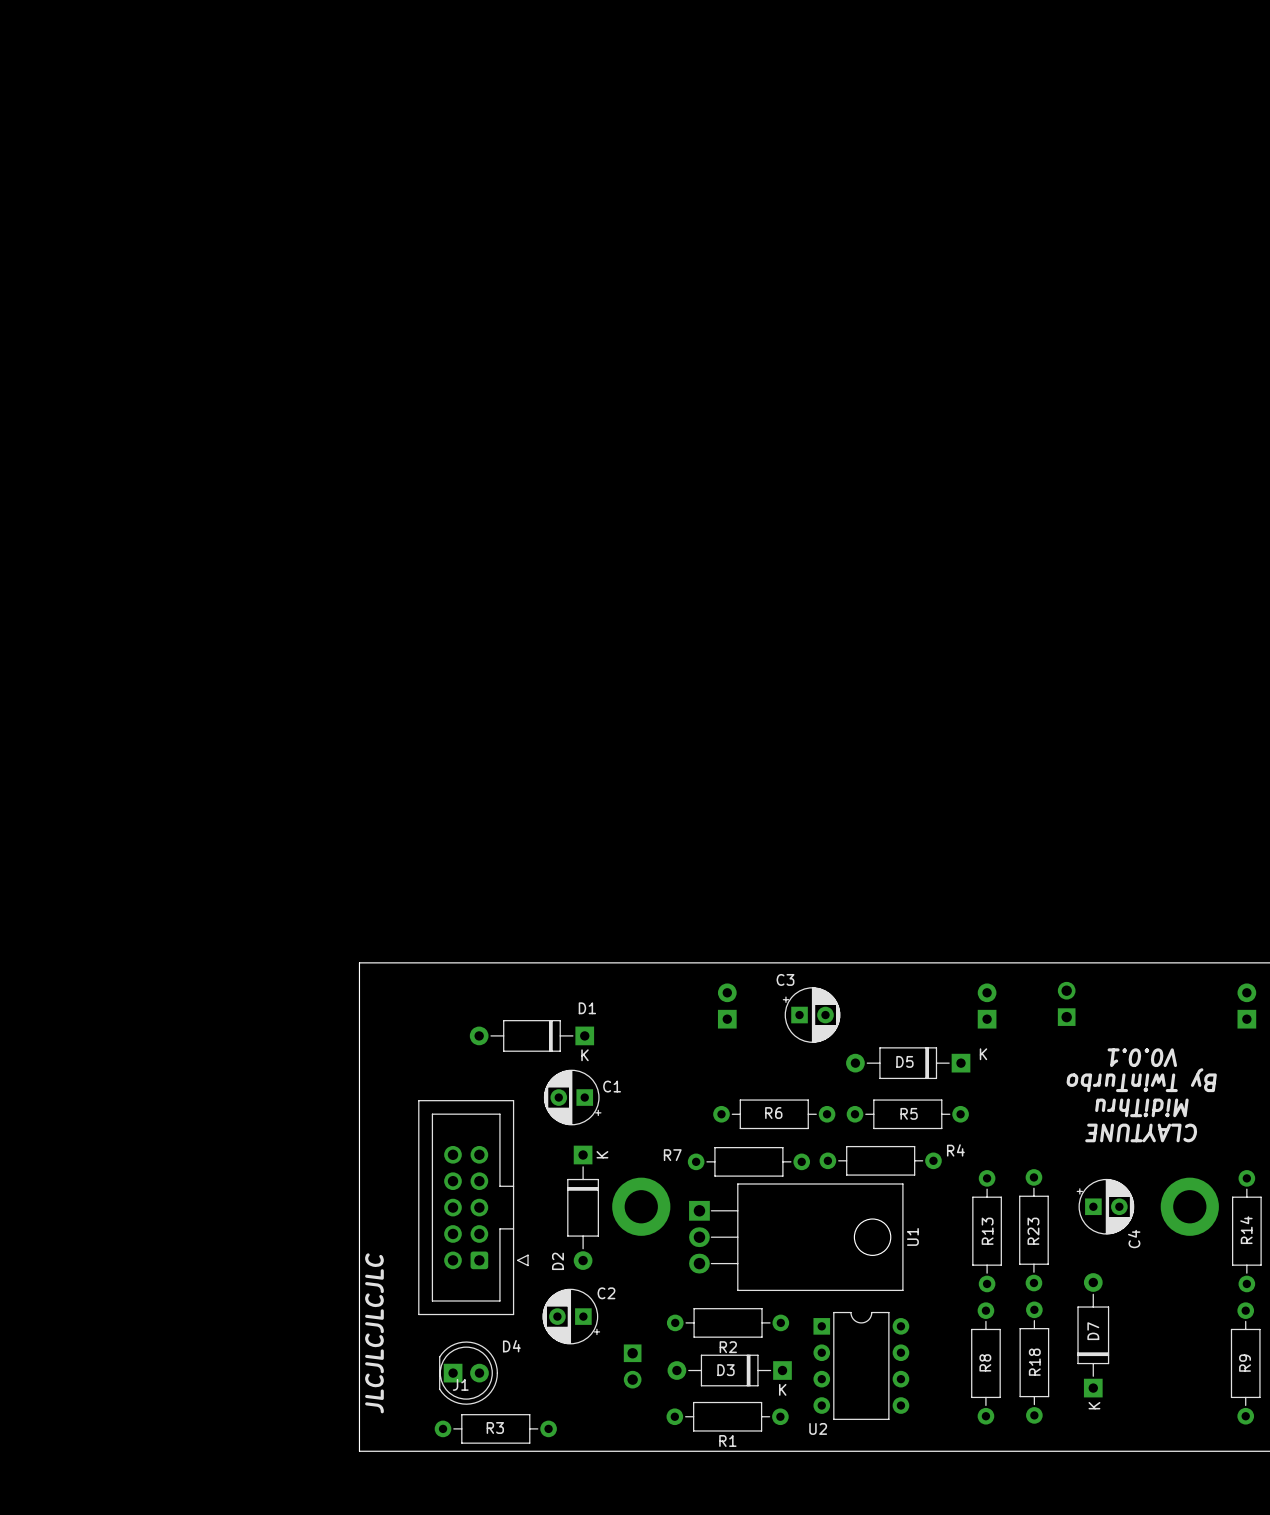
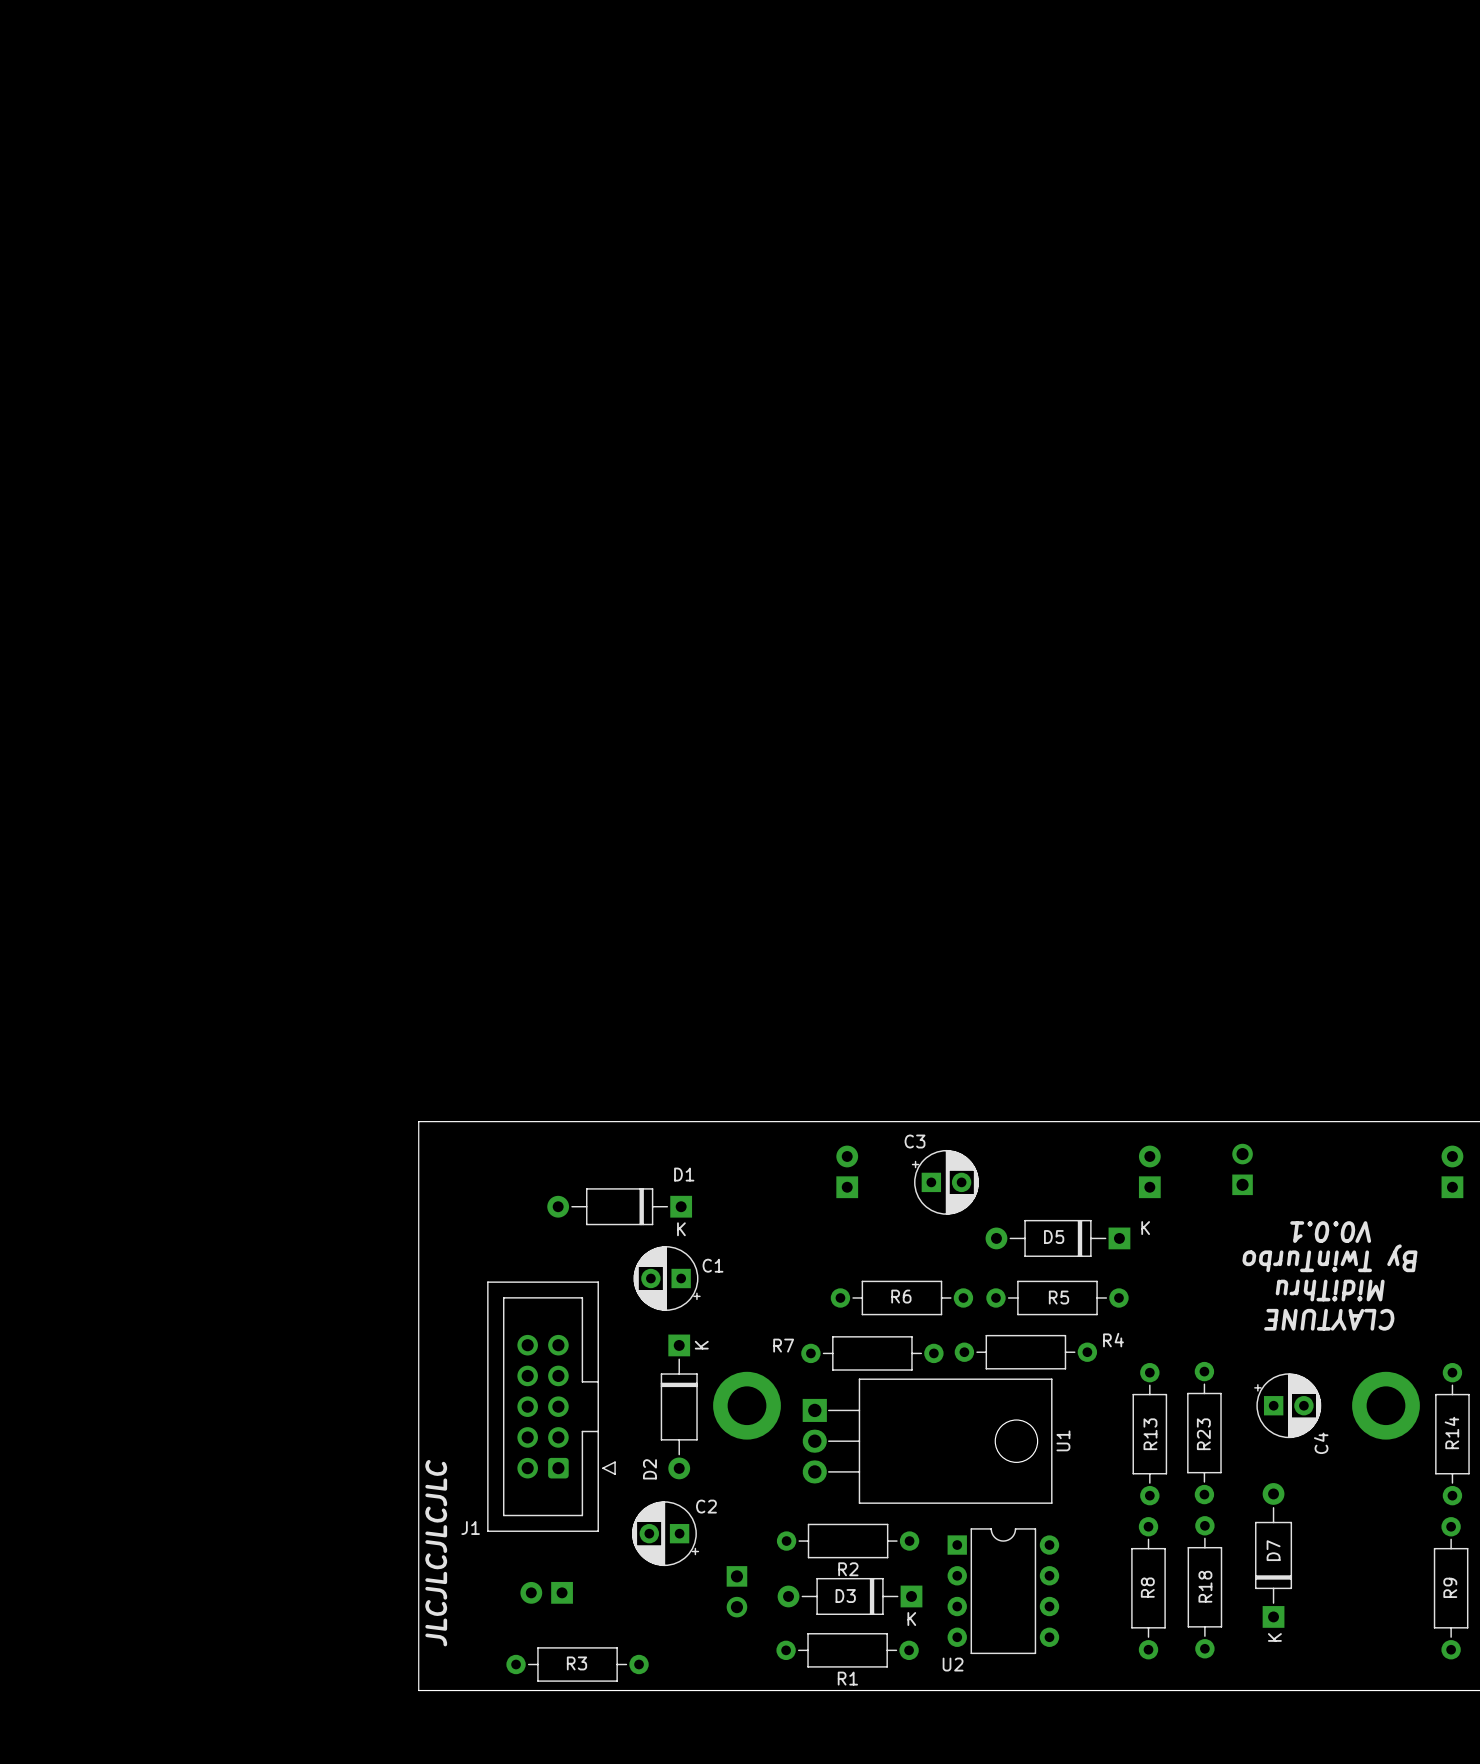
D4 side: top (468, 1373) -> bottom (546, 1592)
J1 name position: J1 (460, 1384) -> J1 (470, 1528)

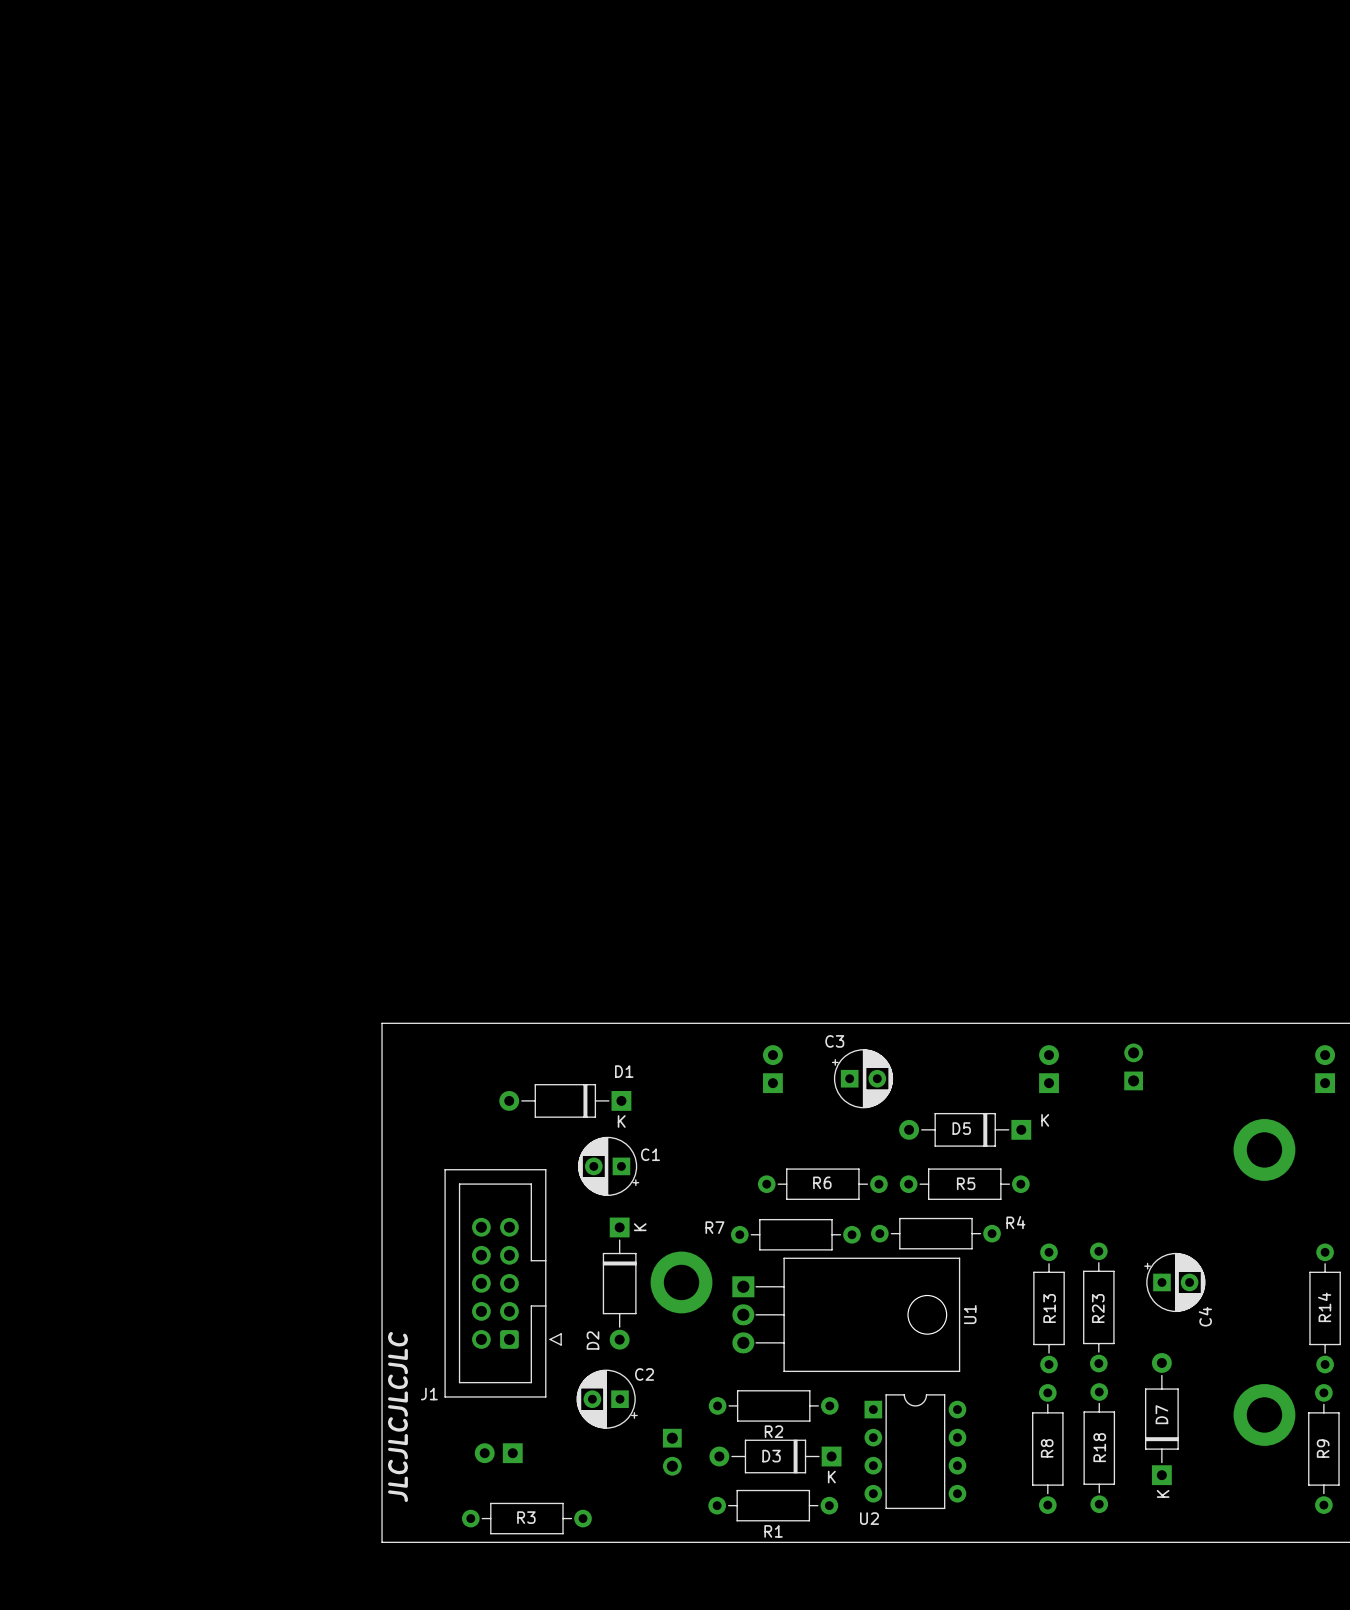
text: V0.0.1 (1330, 1232) -> none
text: By TwinTurbo (1329, 1258) -> none
part: none -> (1264, 1149)
text: MidiThru (1330, 1290) -> none
text: CLAYTUNE (1329, 1319) -> none
part: (1385, 1405) -> none
part: none -> (1264, 1414)

